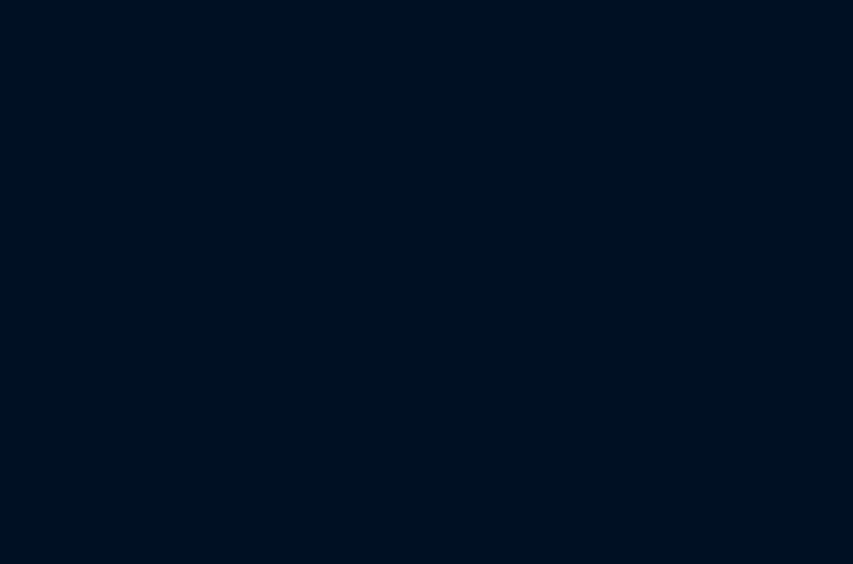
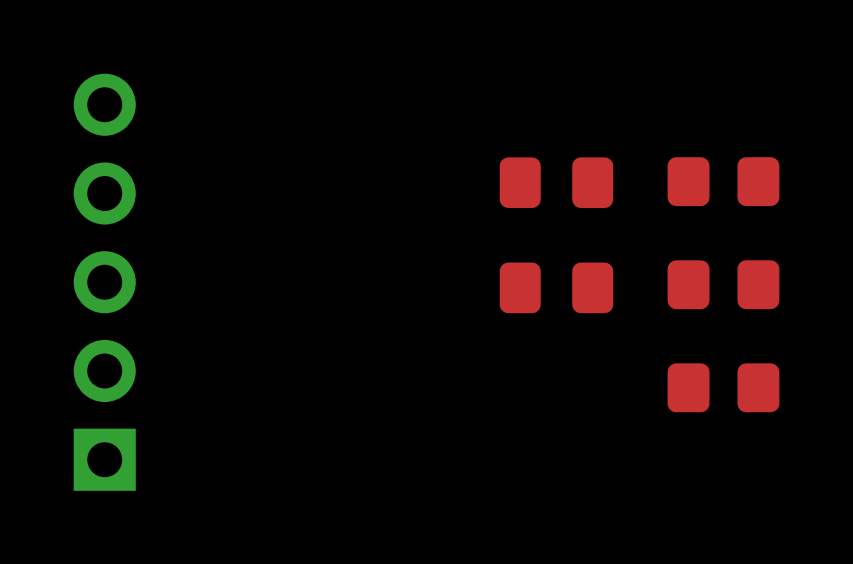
part: none -> (723, 181)
part: none -> (556, 182)
part: none -> (104, 282)
part: none -> (723, 284)
part: none -> (556, 287)
part: none -> (723, 387)

